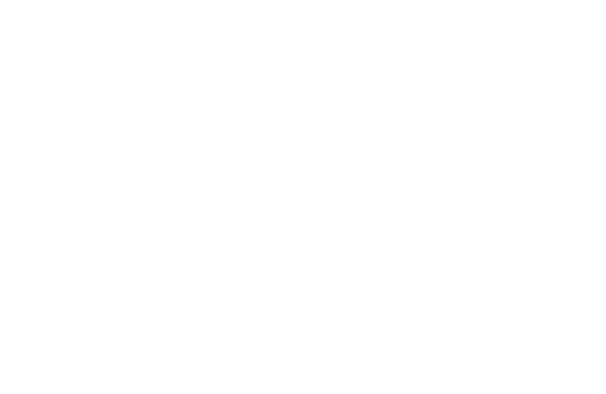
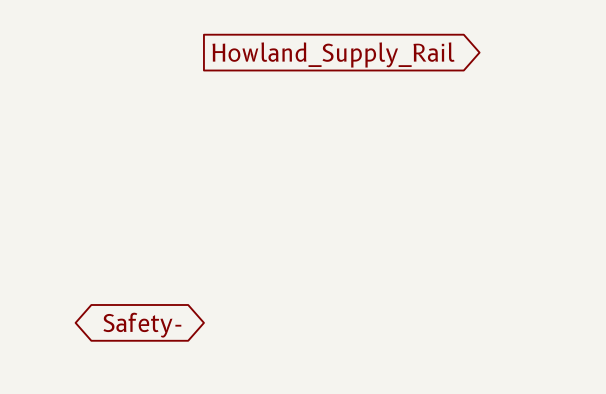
global label: none -> Howland_Supply_Rail (333, 54)
global label: none -> Safety- (142, 325)

